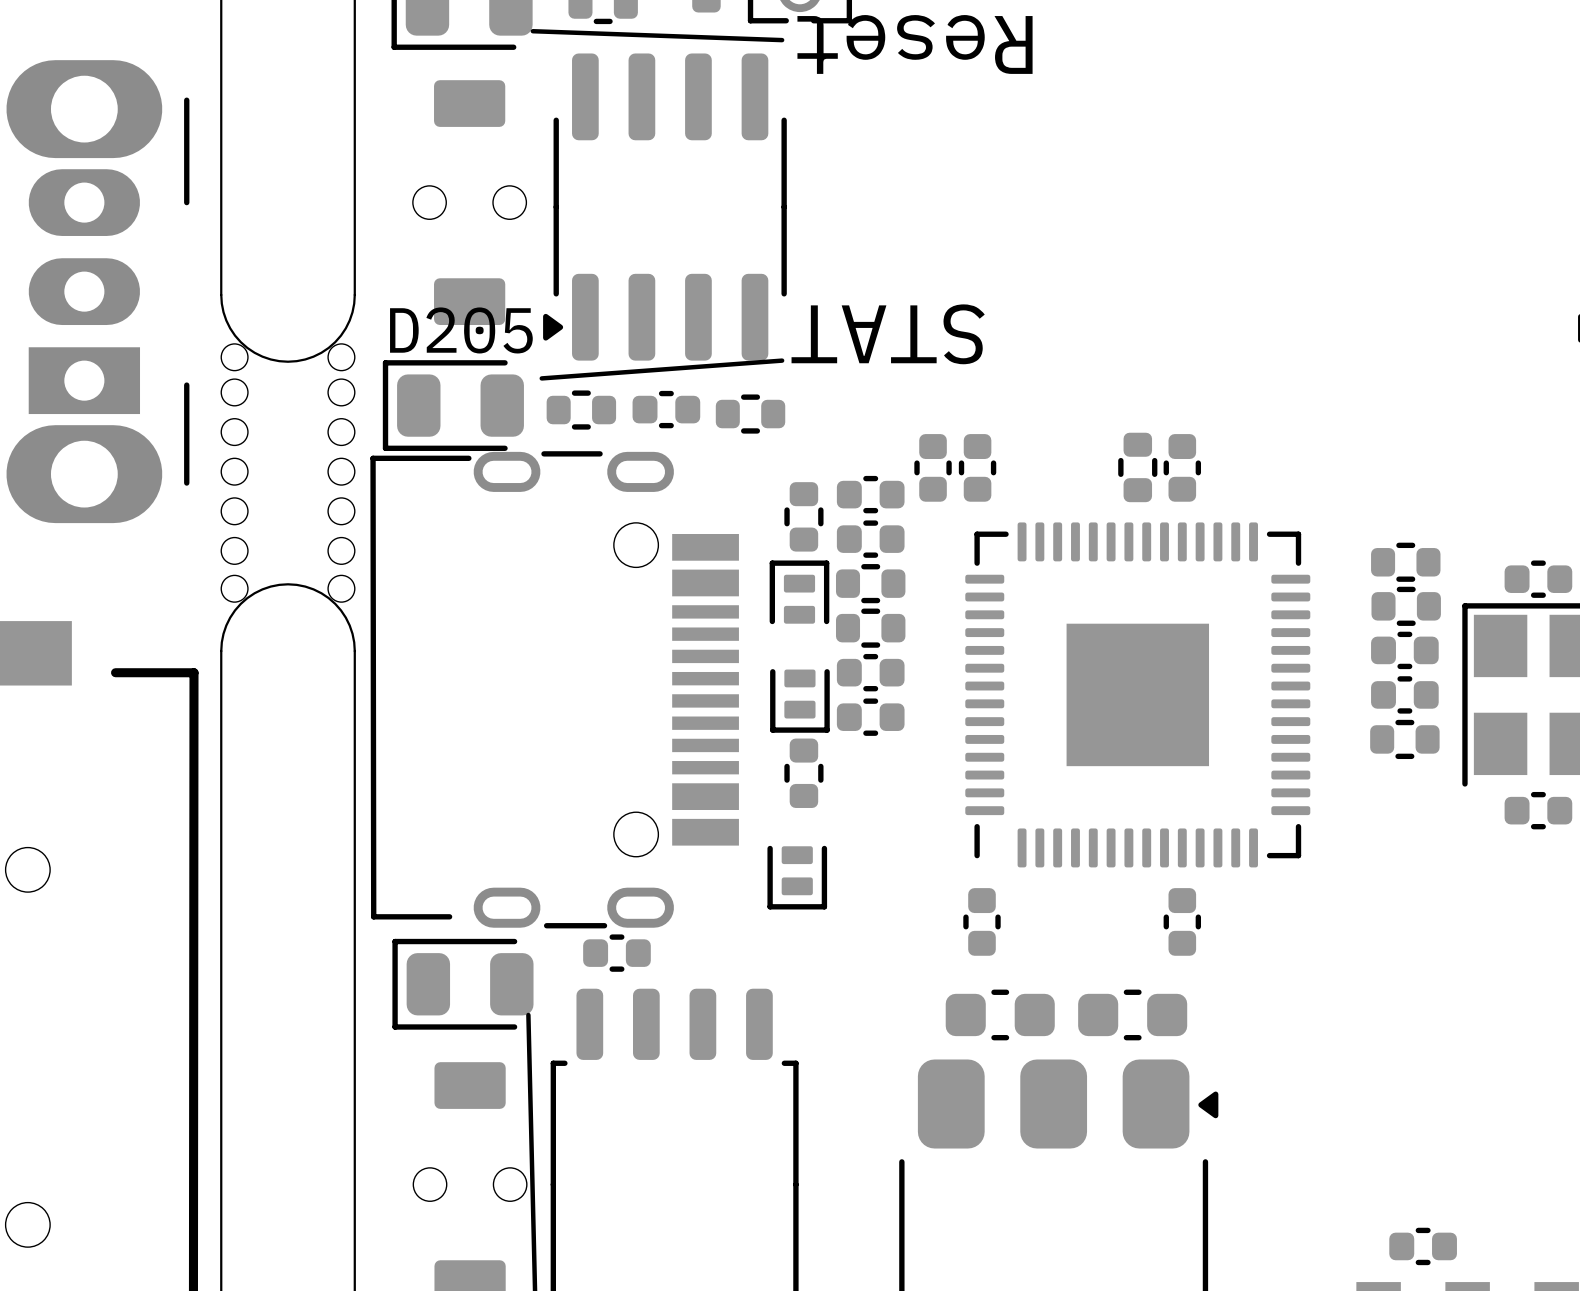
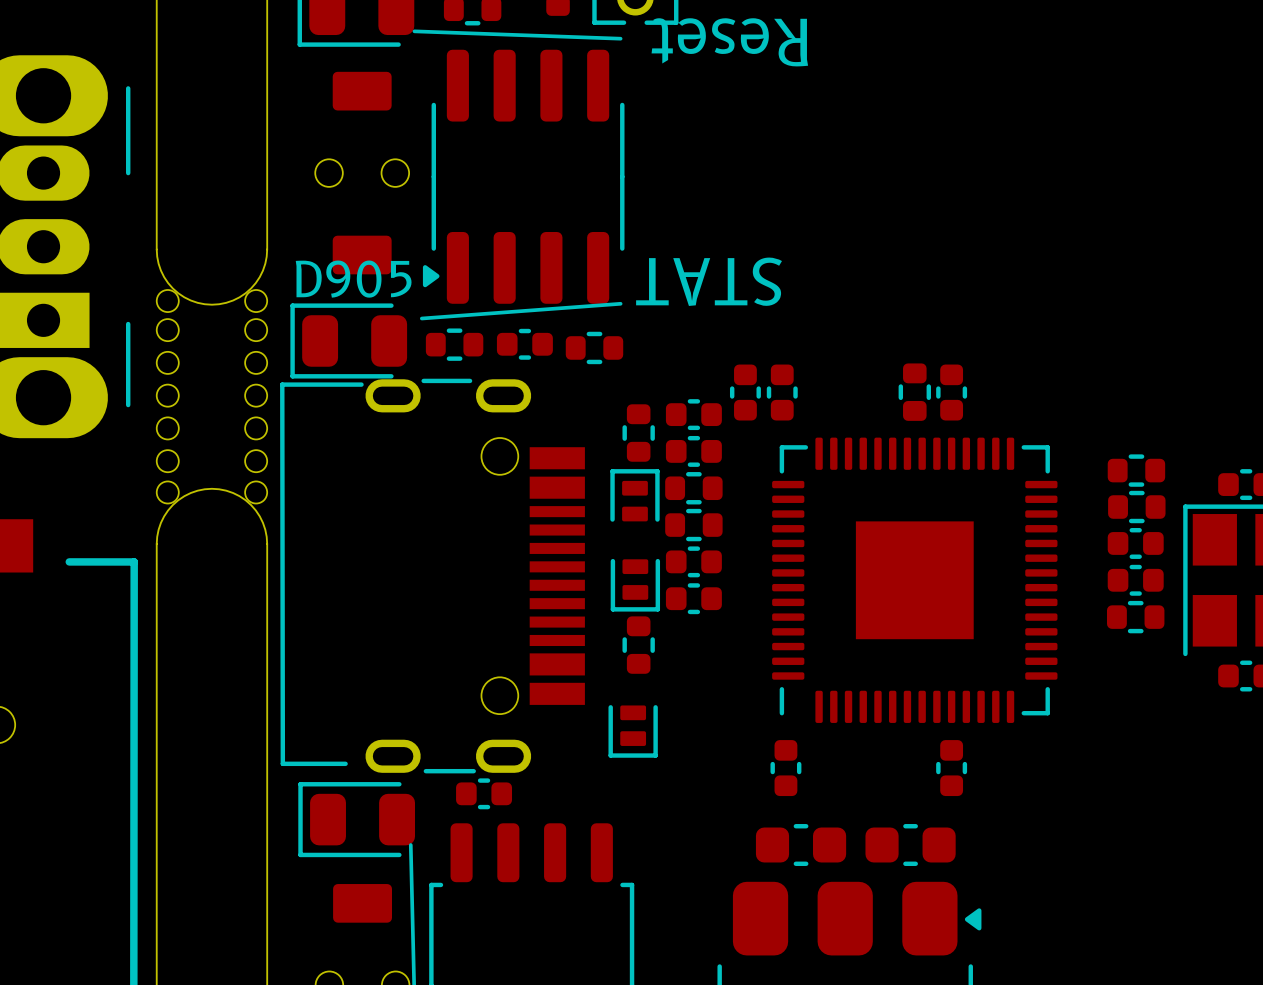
D205 name: D205 (461, 330) -> D905 (353, 279)

